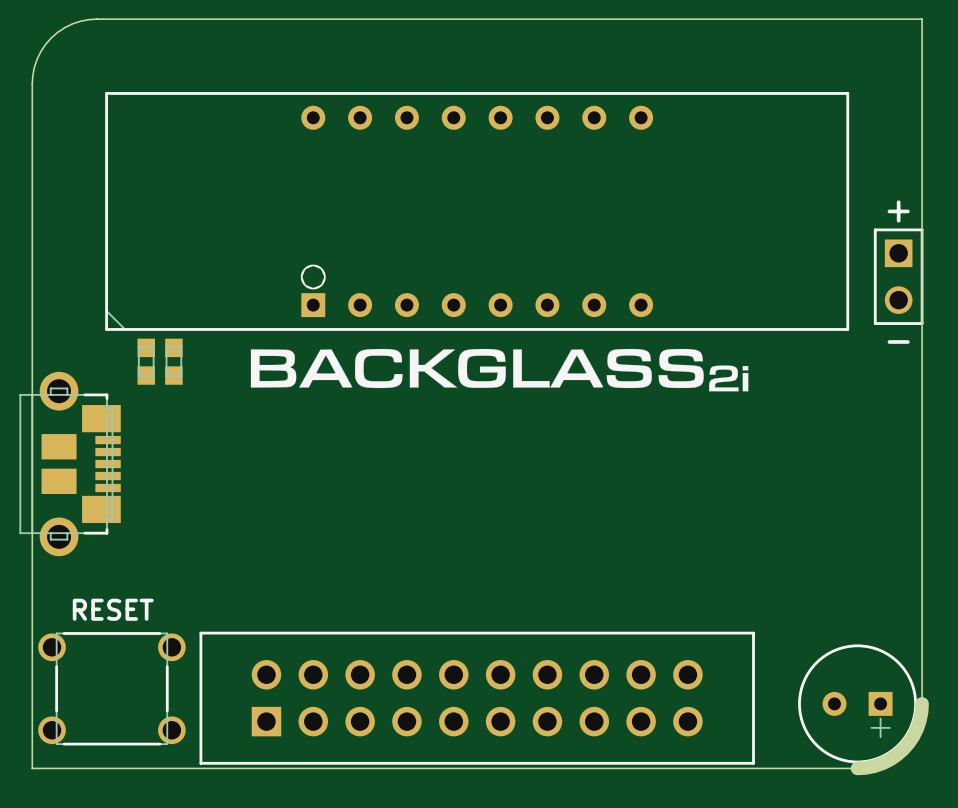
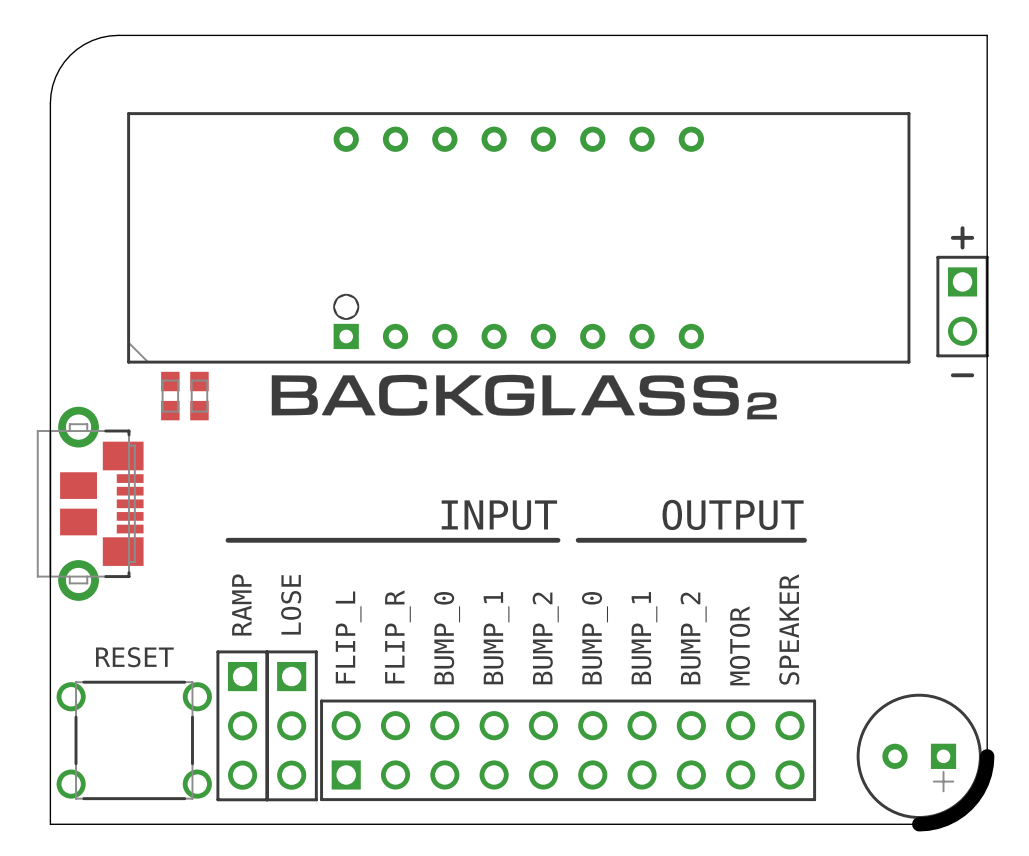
drawing: none -> [271, 374, 778, 420]
drawing: [250, 348, 749, 392] -> none
text: none -> INPUT (499, 515)
text: none -> OUTPUT (733, 514)
line: none -> (228, 540) (558, 540)
line: none -> (578, 540) (804, 540)
text: none -> RAMP (241, 604)
text: none -> LOSE (291, 604)
text: none -> SPEAKER (789, 629)
text: none -> BUMP_0 (447, 638)
text: none -> BUMP_1 (496, 638)
text: none -> BUMP_2 (545, 638)
text: none -> BUMP_0 (594, 638)
text: none -> BUMP_1 (644, 638)
text: none -> BUMP_2 (693, 638)
text: none -> MOTOR (739, 645)
text: none -> FLIP_R (397, 636)
text: none -> FLIP_L (348, 637)
part: none -> (242, 725)
part: none -> (291, 725)
part: (477, 698) -> none
part: none -> (568, 750)

